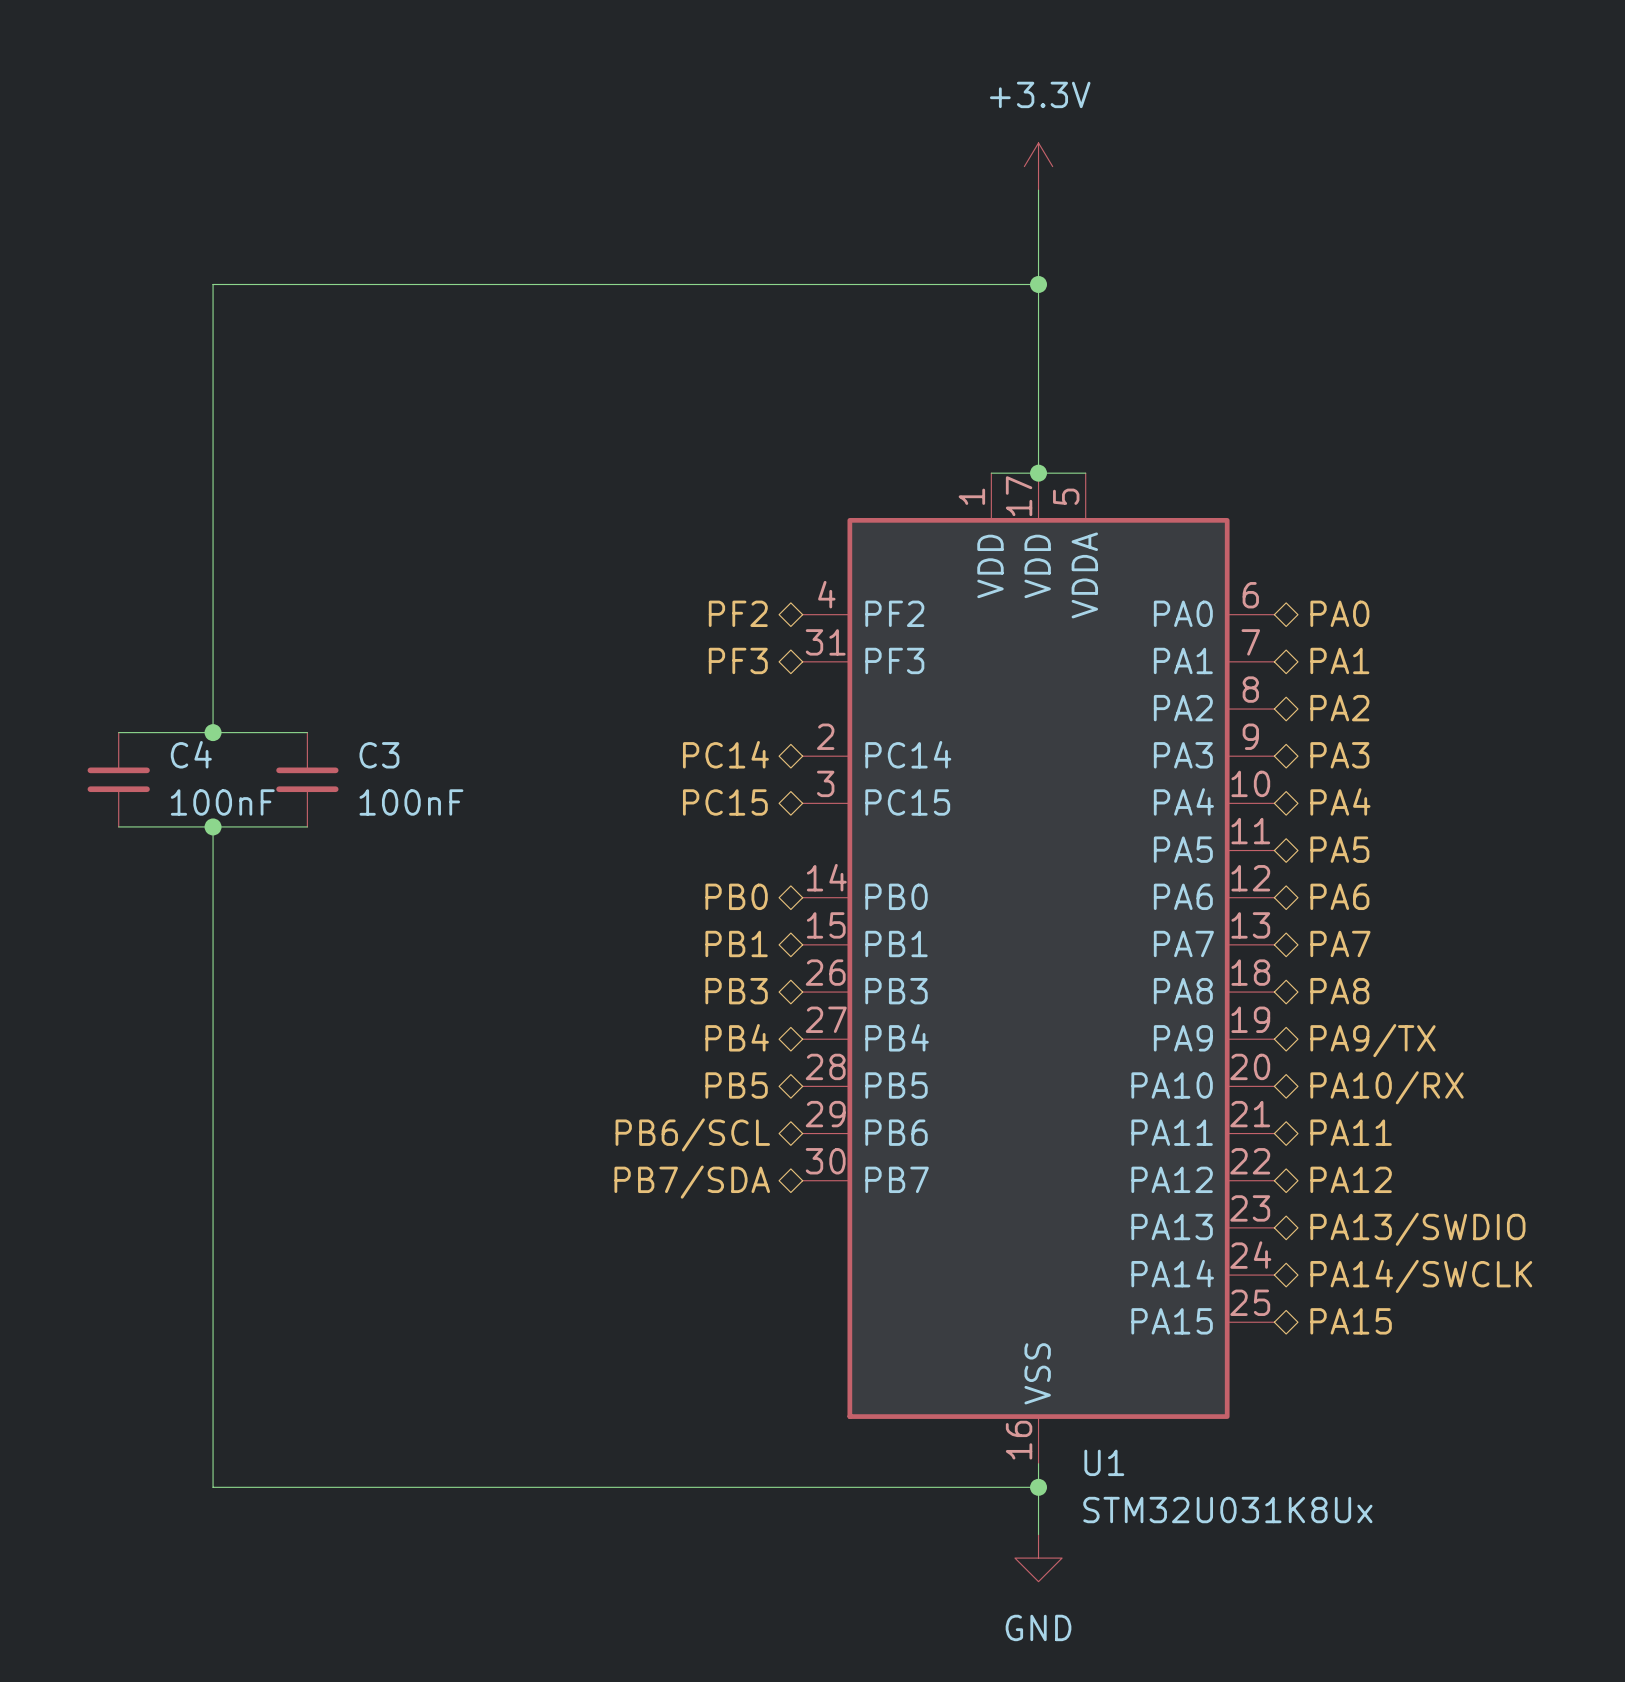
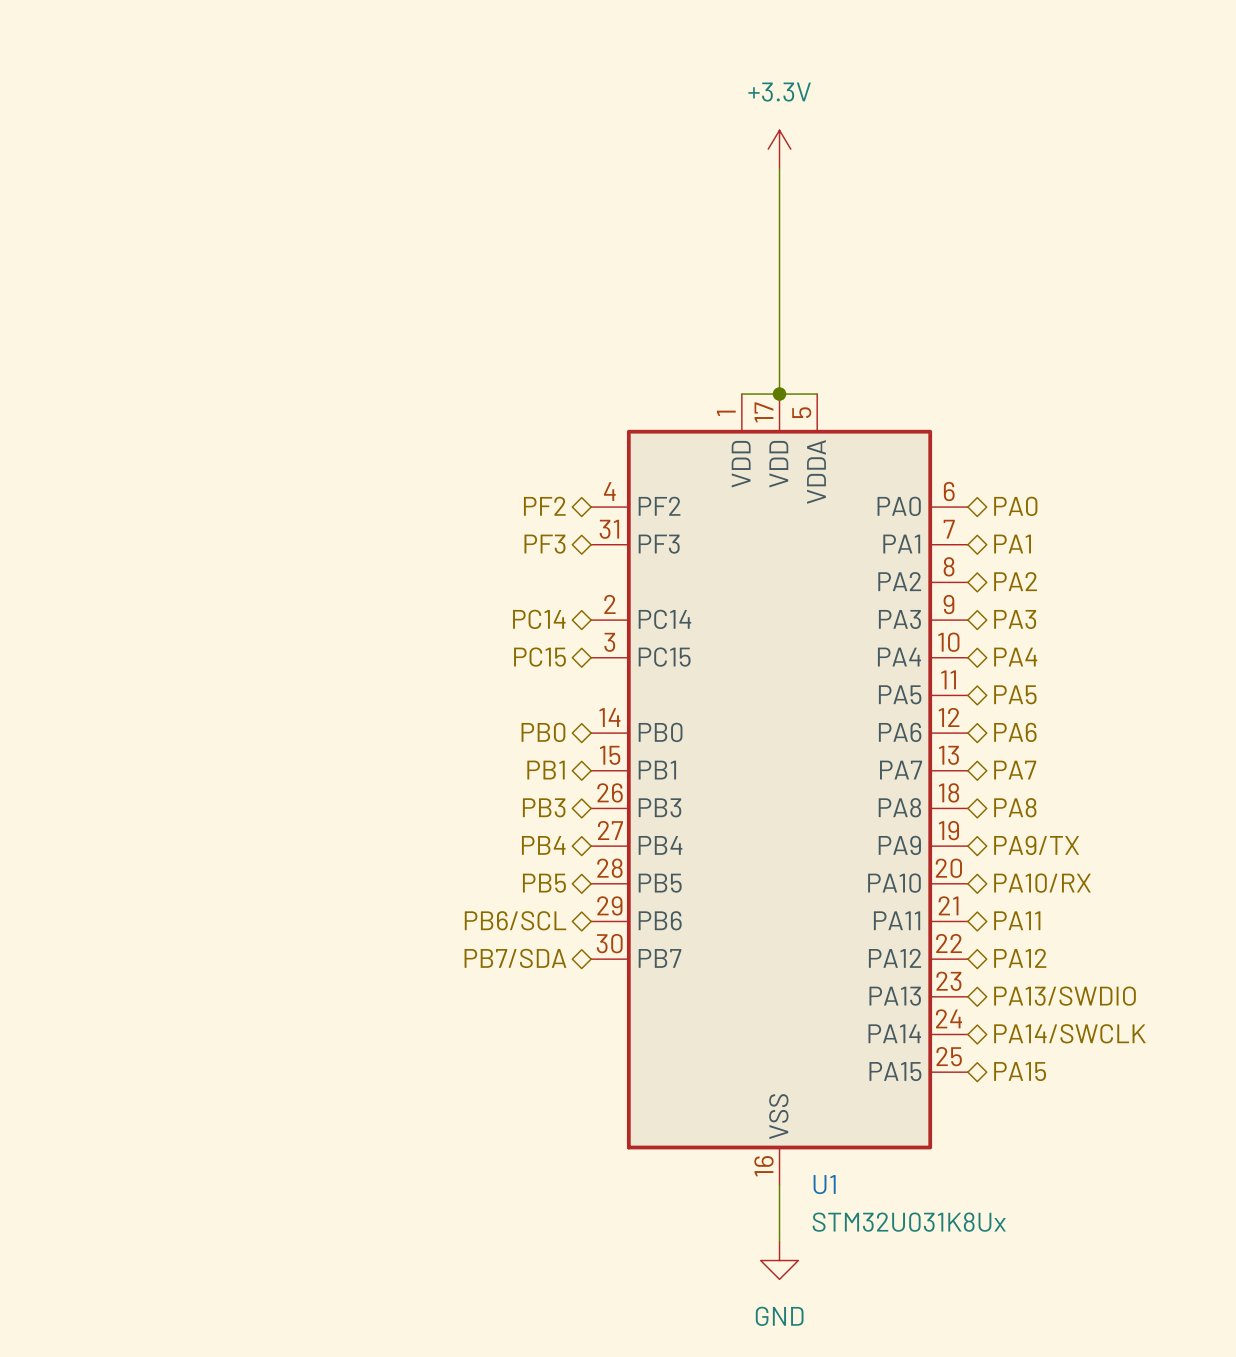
wire: (1038, 284) (213, 284) (213, 732) -> none
junction: (1038, 284) -> none
wire: (118, 732) (307, 732) -> none
junction: (213, 732) -> none
C4: 100nF (118, 779) -> none
C3: 100nF (307, 779) -> none
wire: (118, 826) (307, 826) -> none
wire: (213, 826) (213, 1487) (1038, 1487) -> none
junction: (213, 826) -> none
junction: (1038, 1487) -> none

